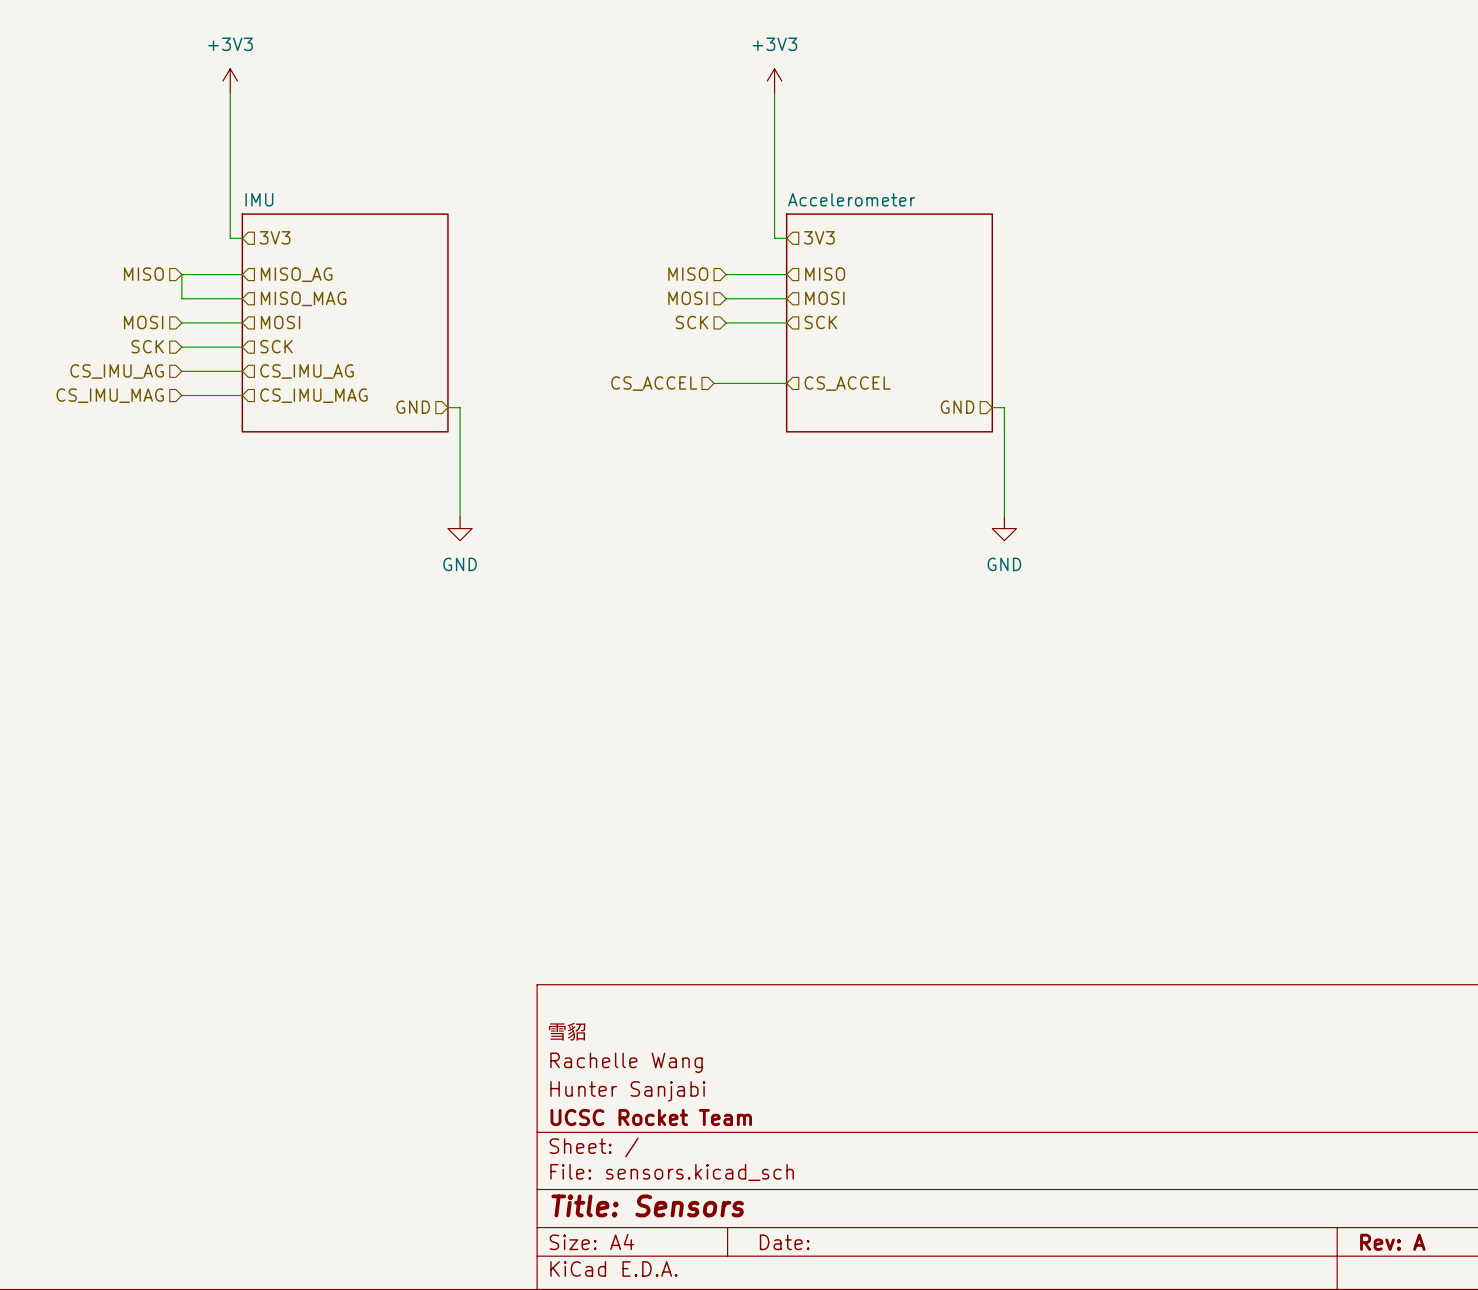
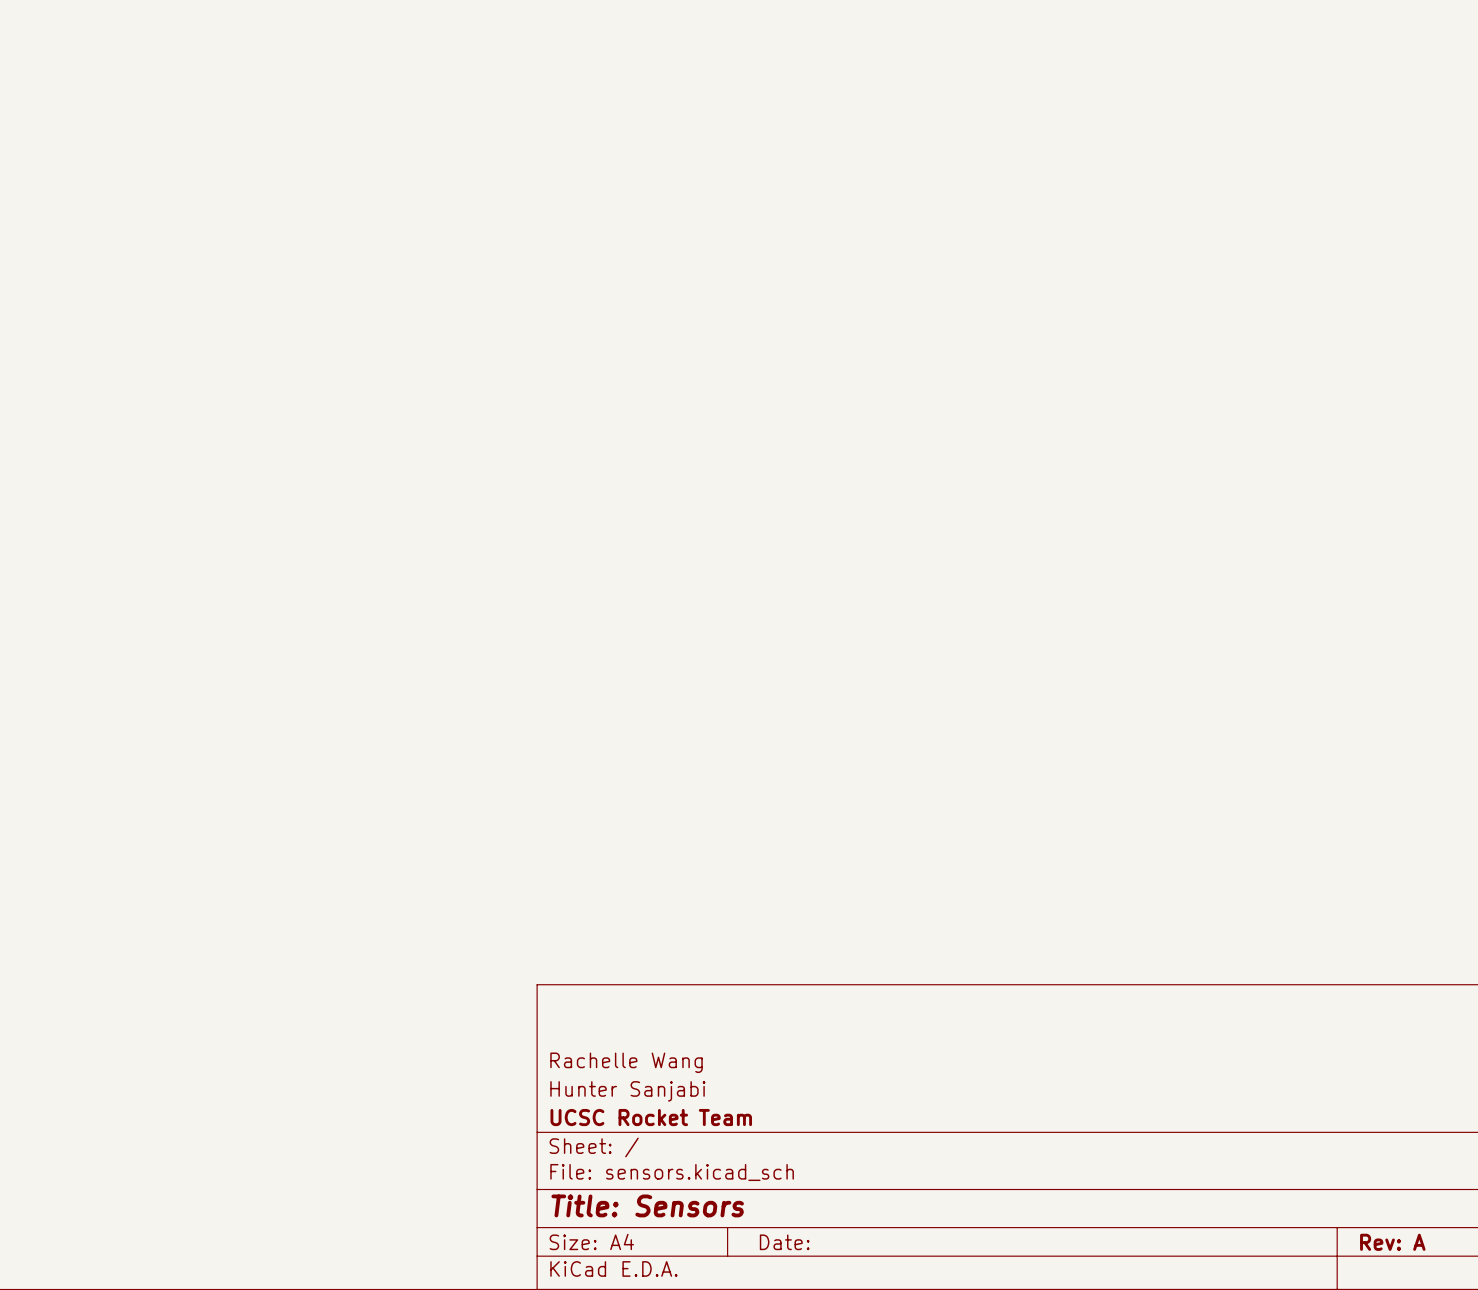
power symbol: +3V3 (230, 81) -> none
power symbol: +3V3 (774, 81) -> none
wire: (230, 93) (230, 238) (242, 238) -> none
wire: (774, 93) (774, 238) (786, 238) -> none
hierarchical label: 3V3 (275, 237) -> none
hierarchical label: 3V3 (819, 237) -> none
hierarchical label: MISO (143, 274) -> none
wire: (242, 274) (181, 274) (181, 298) (242, 298) -> none
hierarchical label: MISO_AG (296, 274) -> none
hierarchical label: MISO (688, 274) -> none
wire: (726, 274) (786, 274) -> none
hierarchical label: MISO (825, 274) -> none
hierarchical label: MISO_MAG (303, 298) -> none
hierarchical label: MOSI (687, 298) -> none
wire: (726, 298) (786, 298) -> none
hierarchical label: MOSI (824, 298) -> none
hierarchical label: MOSI (143, 322) -> none
wire: (181, 322) (242, 322) -> none
hierarchical label: MOSI (280, 322) -> none
sheet IMU: (345, 322) -> none
hierarchical label: SCK (692, 322) -> none
wire: (726, 322) (786, 322) -> none
hierarchical label: SCK (820, 322) -> none
sheet Accelerometer: (889, 322) -> none
hierarchical label: SCK (147, 346) -> none
hierarchical label: SCK (276, 346) -> none
wire: (181, 347) (242, 347) -> none
hierarchical label: CS_IMU_AG (117, 371) -> none
wire: (181, 371) (242, 371) -> none
hierarchical label: CS_IMU_AG (307, 371) -> none
hierarchical label: CS_ACCEL (654, 383) -> none
wire: (714, 383) (786, 383) -> none
hierarchical label: CS_ACCEL (847, 383) -> none
hierarchical label: CS_IMU_MAG (110, 395) -> none
wire: (181, 395) (242, 395) -> none
hierarchical label: CS_IMU_MAG (313, 395) -> none
hierarchical label: GND (413, 407) -> none
wire: (447, 407) (460, 407) (460, 516) -> none
hierarchical label: GND (957, 407) -> none
wire: (992, 407) (1004, 407) (1004, 516) -> none
power symbol: GND (460, 528) -> none
power symbol: GND (1004, 528) -> none
title block: 雪貂 (567, 1031) -> none

